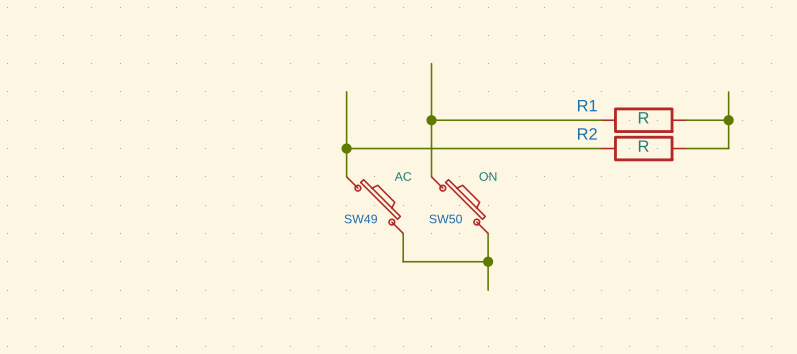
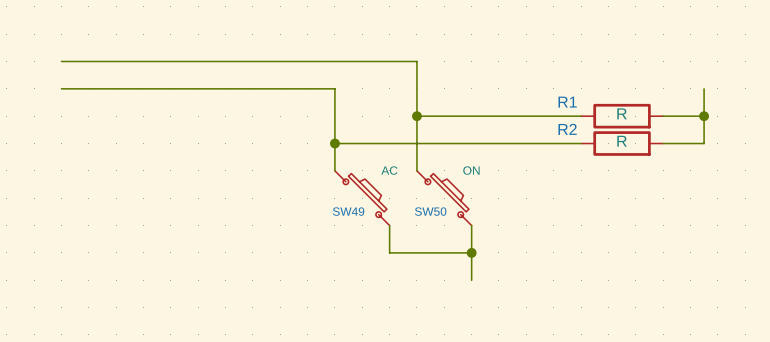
wire: none -> (61, 61) (416, 61)
wire: none -> (61, 88) (334, 88)

